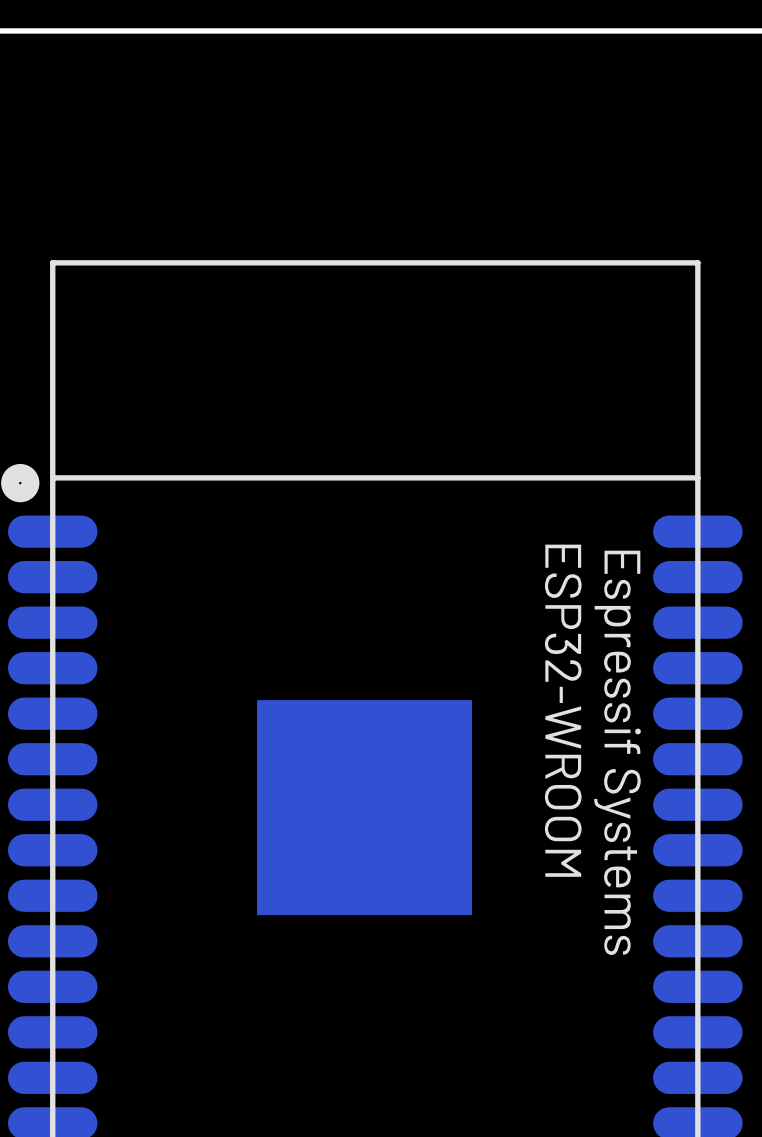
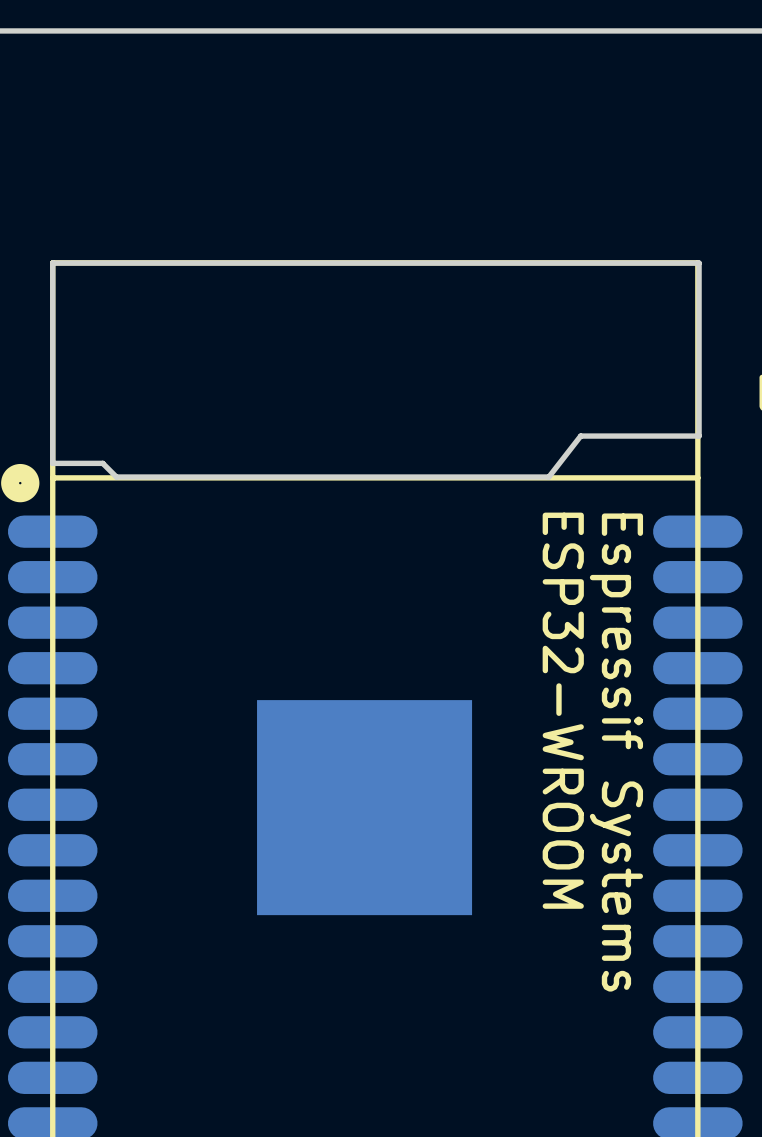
board edge: none -> (699, 263) (699, 436) (580, 436) (548, 477) (116, 477) (102, 463) (52, 463) (52, 263) (699, 263)

